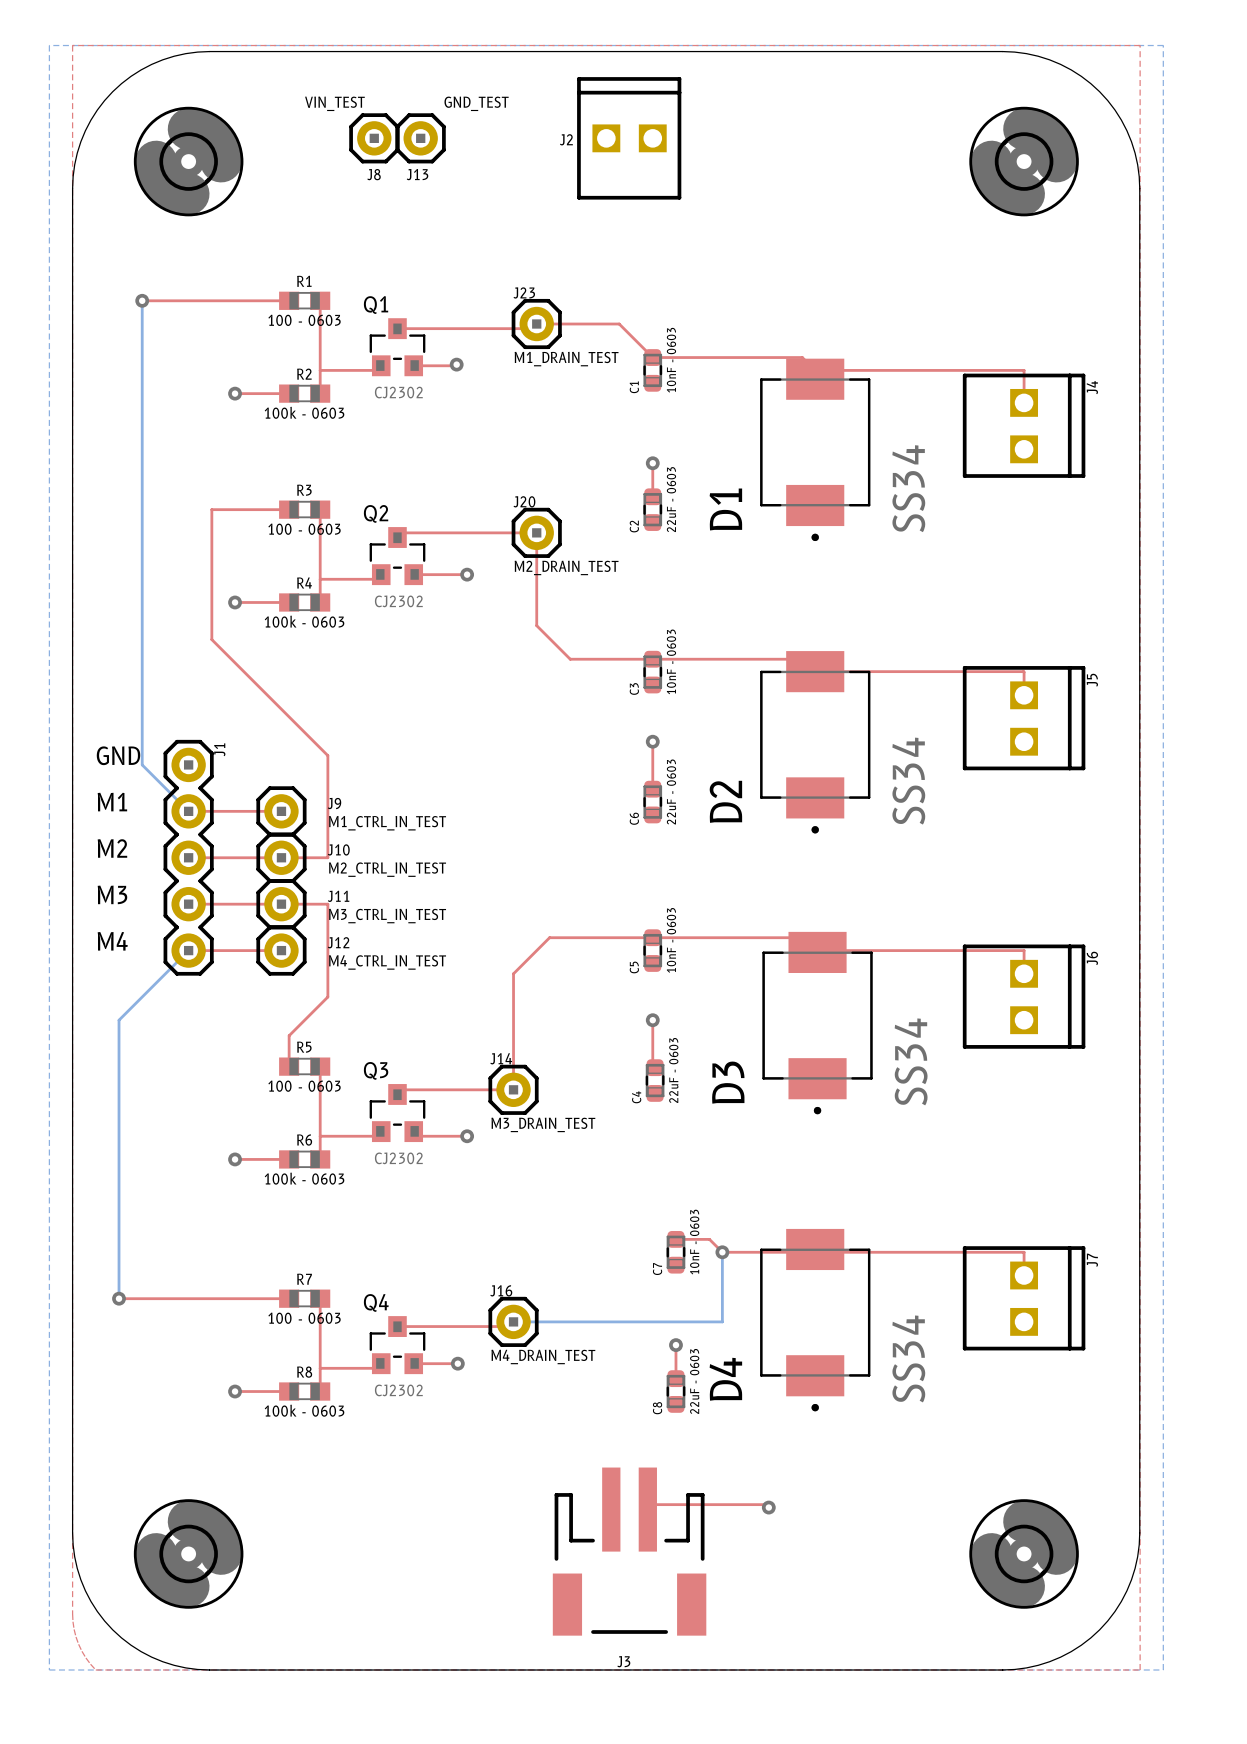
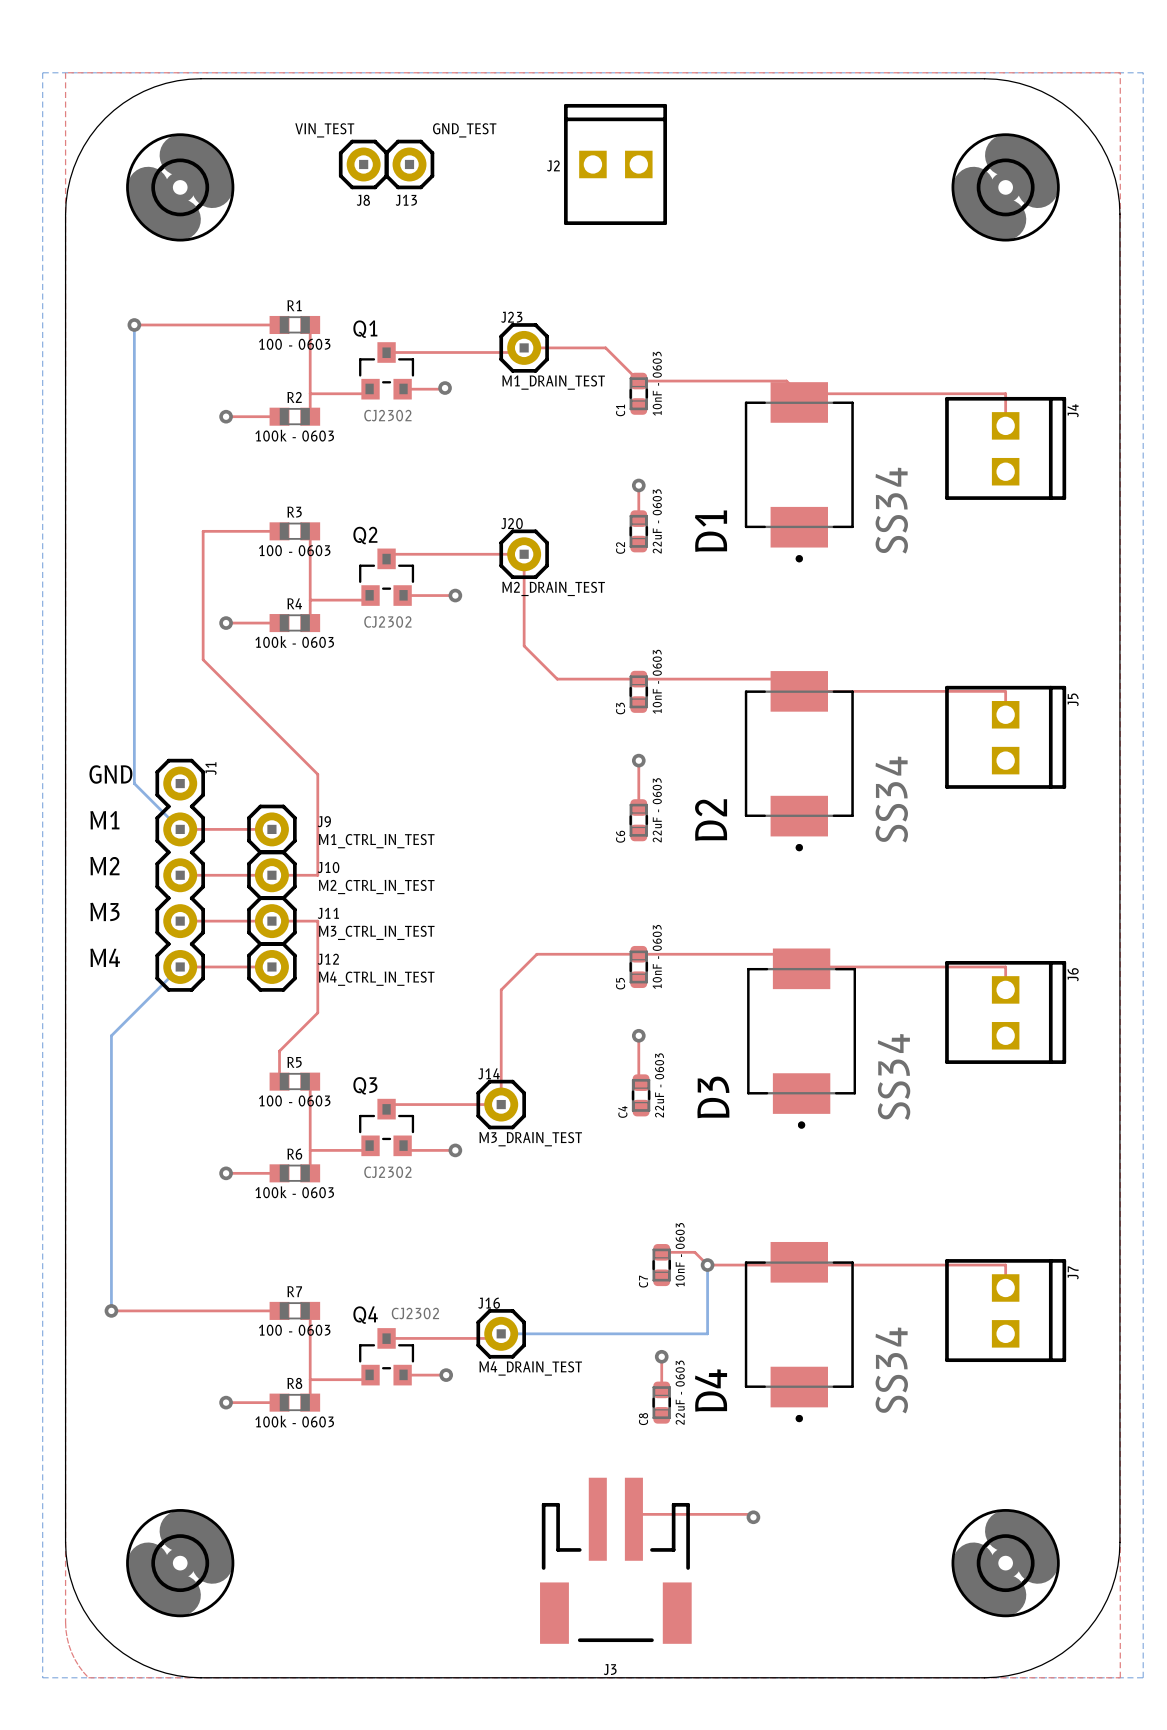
Q4 value position: CJ2302 (398, 1390) -> CJ2302 (415, 1313)

